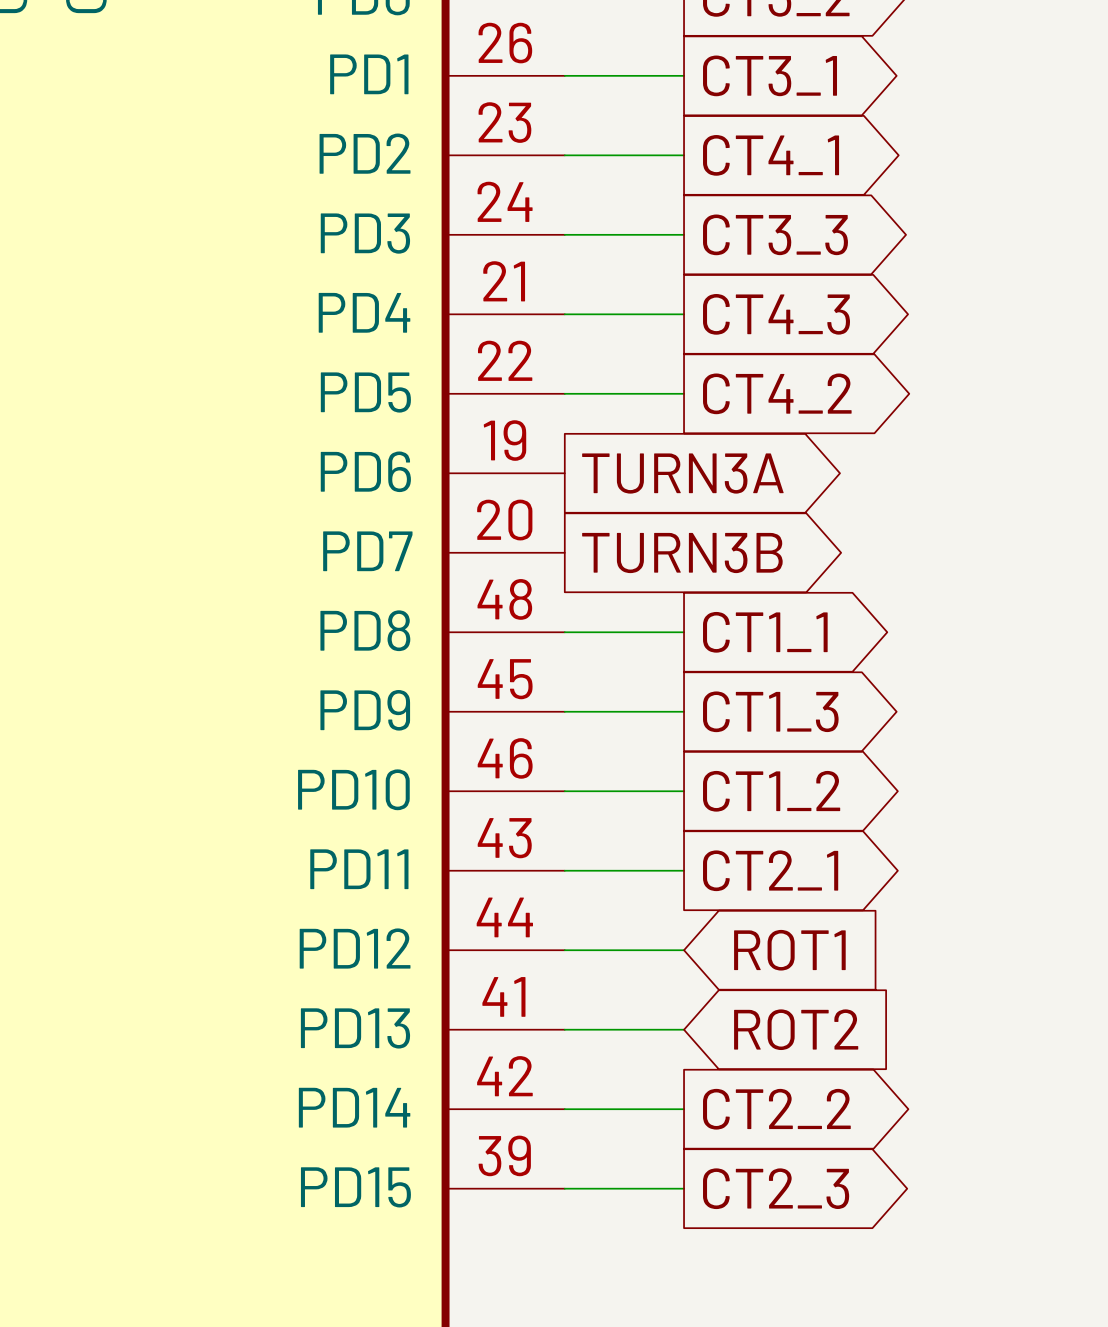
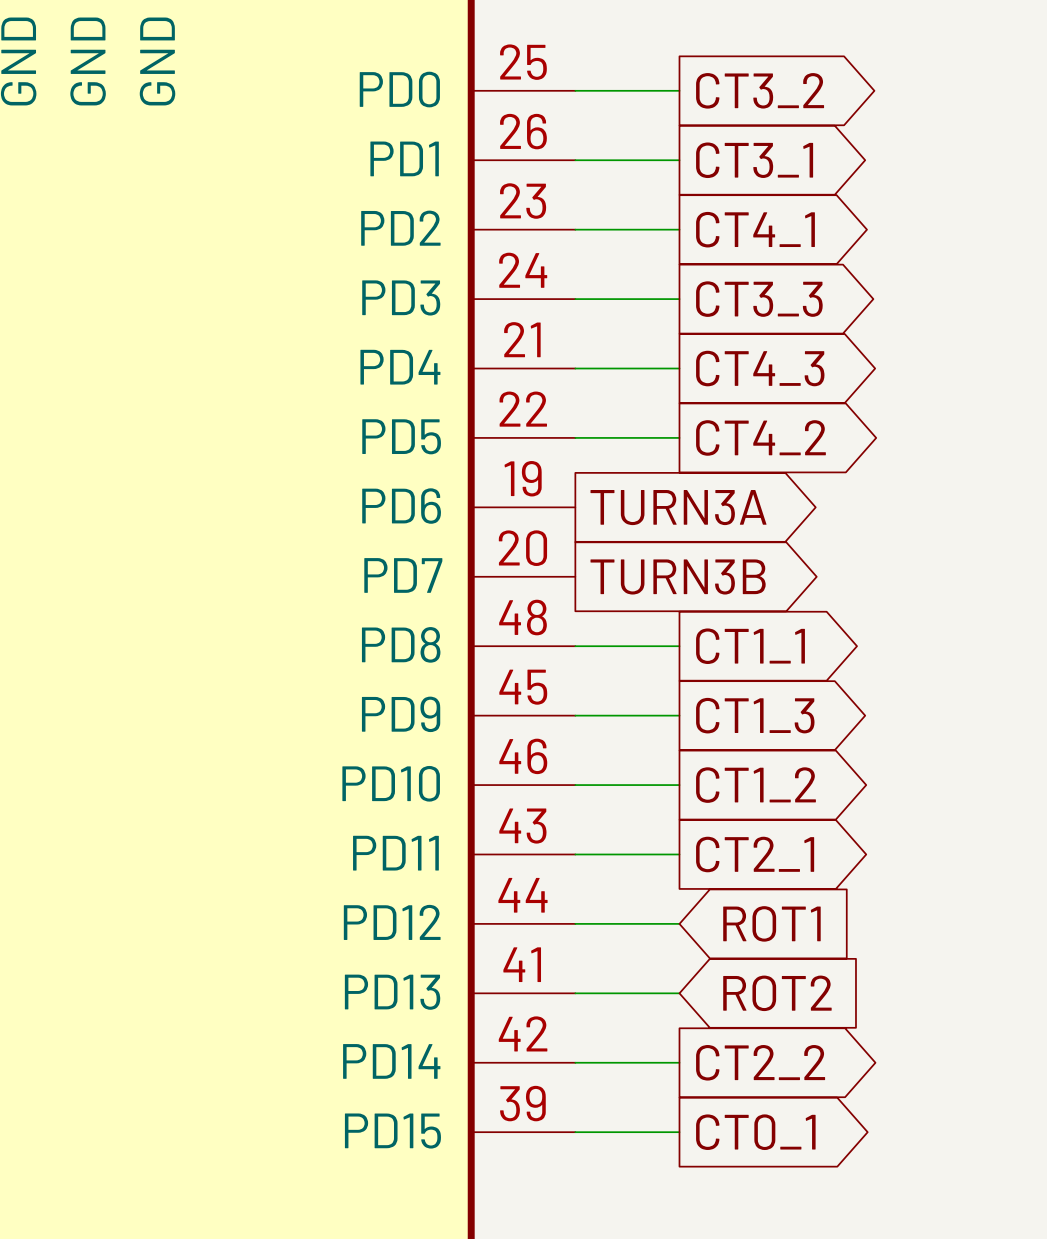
global label: CT2_3 (776, 1188) -> CT0_1 (755, 1132)

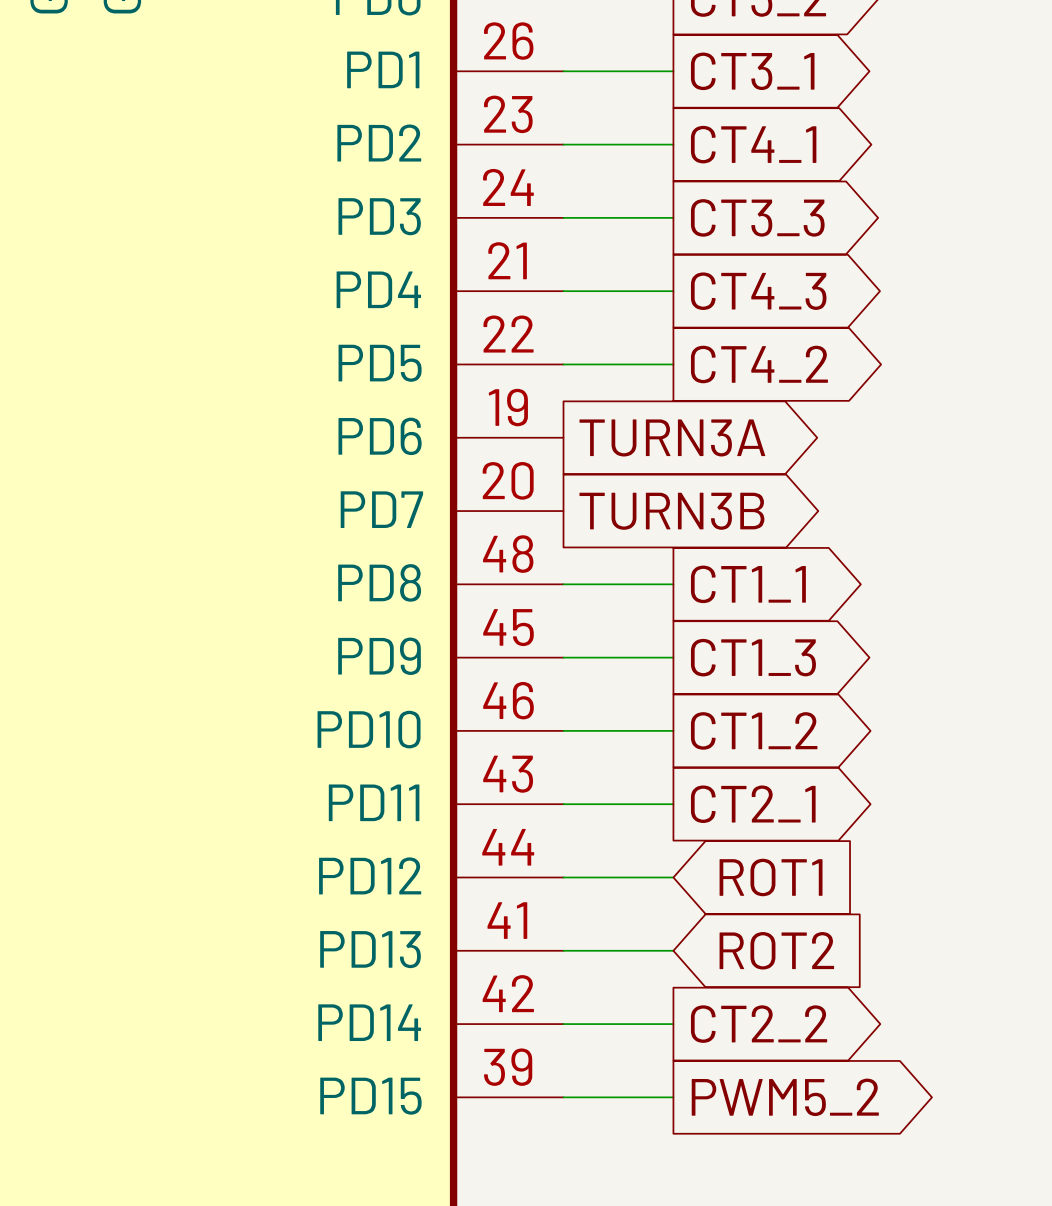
global label: CT0_1 (755, 1132) -> PWM5_2 (785, 1097)

